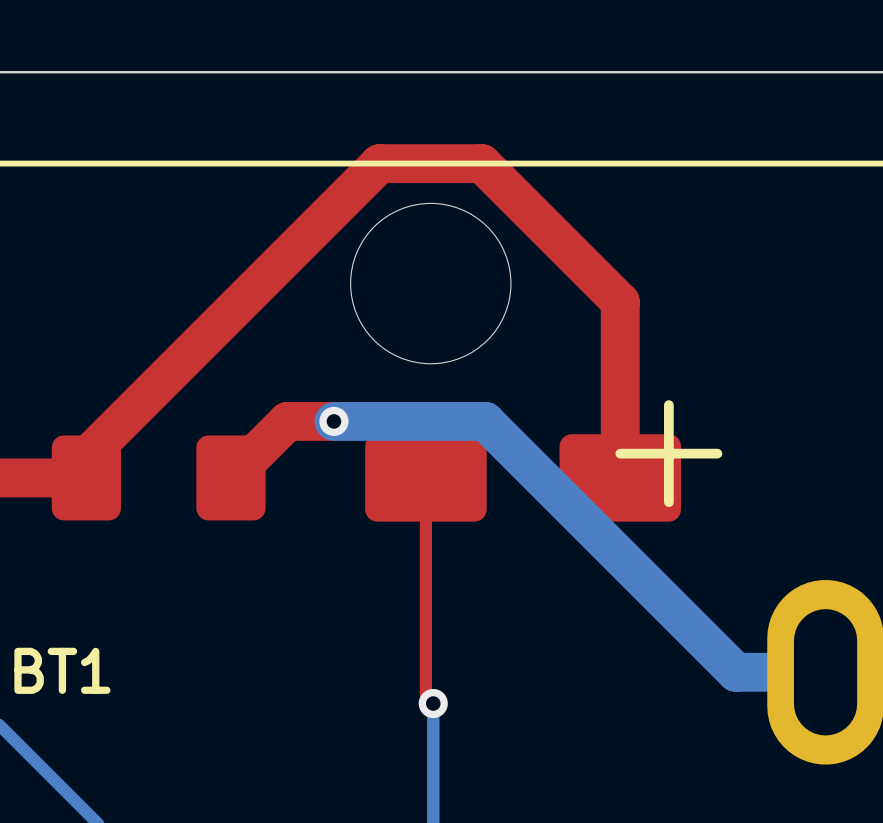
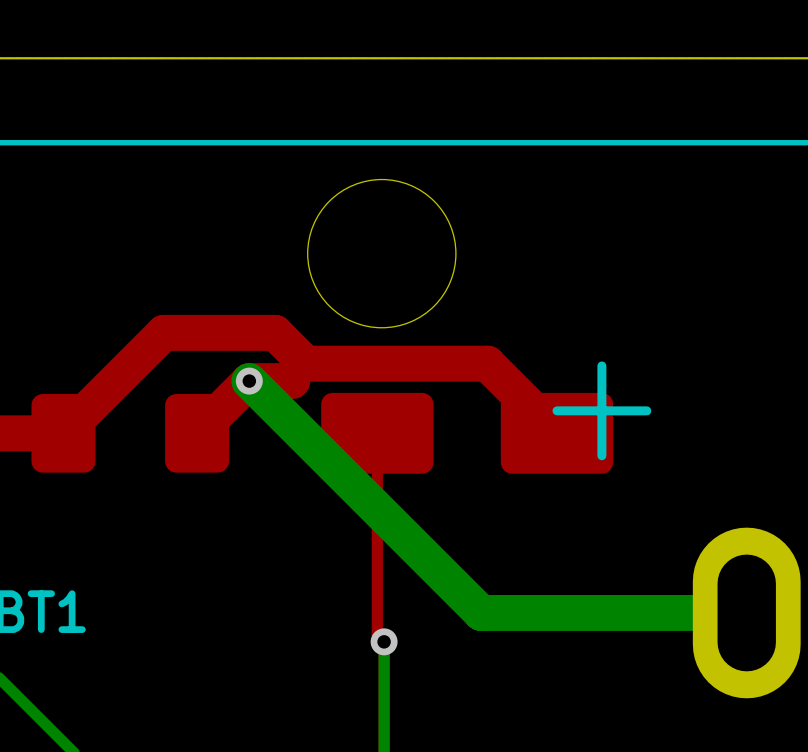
bottom track: (333, 421) (485, 421) (736, 672) -> (249, 381) (481, 612) (664, 612)
via position: (333, 421) -> (249, 381)
top track: (620, 477) (620, 301) (481, 163) (379, 163) (86, 456) (86, 477) -> (556, 433) (487, 363) (305, 363) (275, 332) (163, 332) (63, 433)

